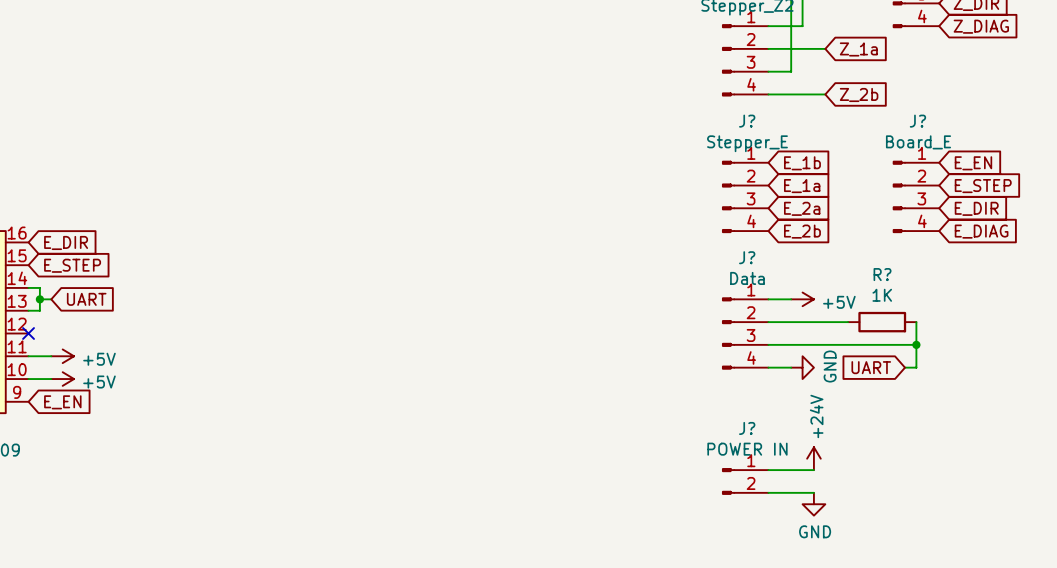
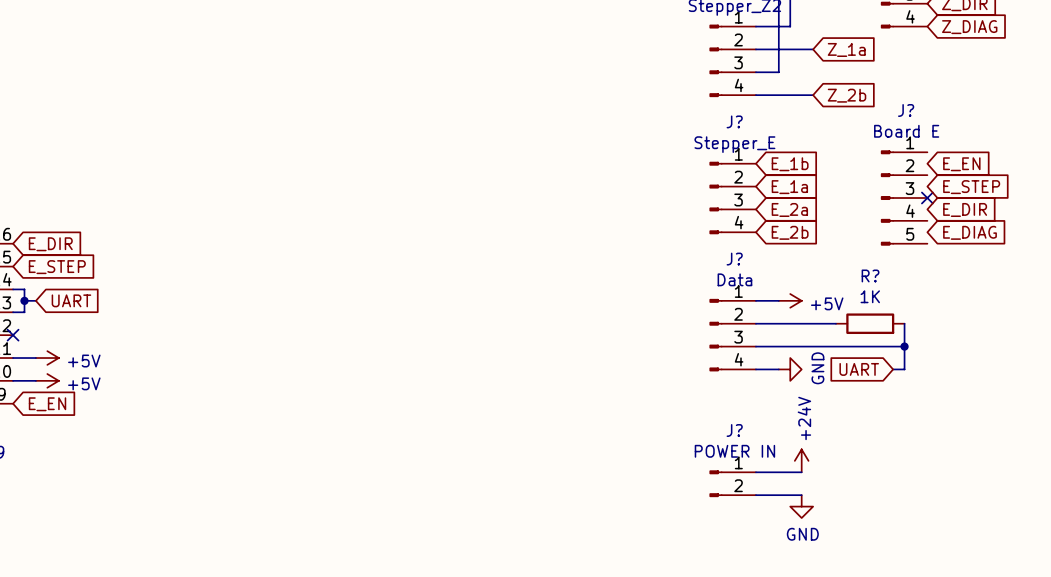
J? value: Board_E (918, 142) -> Board E (906, 131)
J? symbol: [892, 160, 940, 233] -> [881, 150, 928, 246]
no-connect mark: none -> (927, 198)

